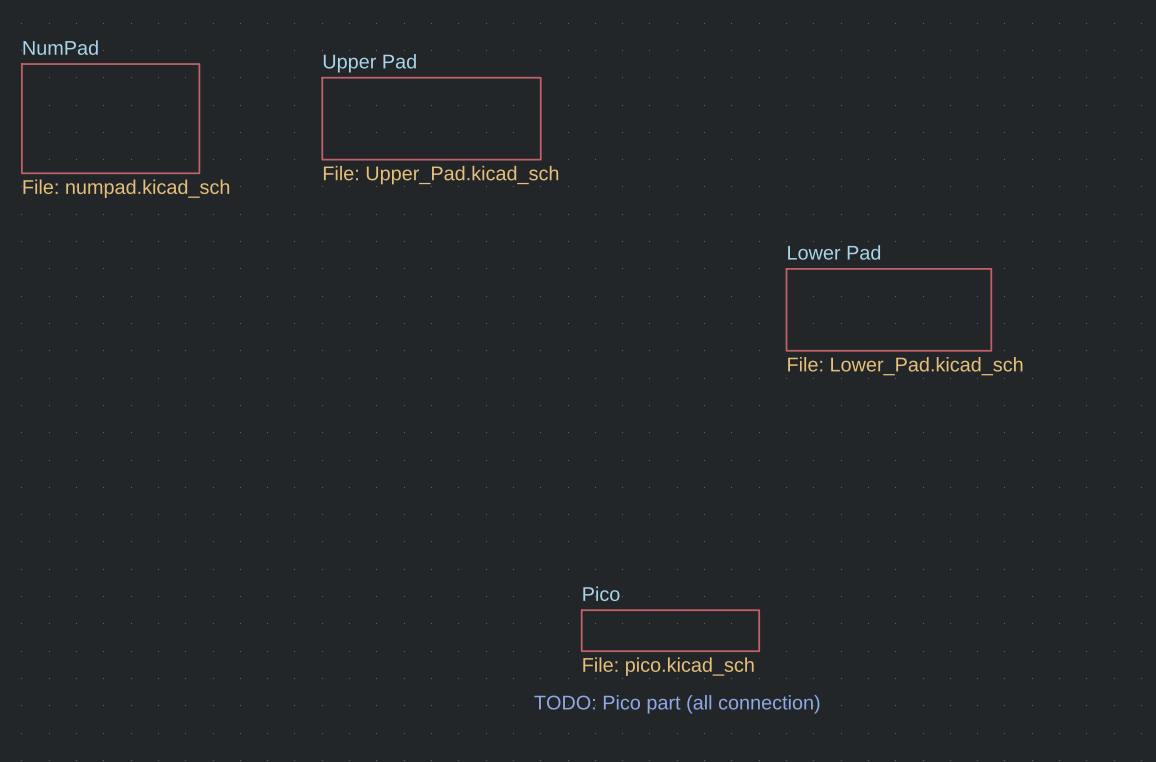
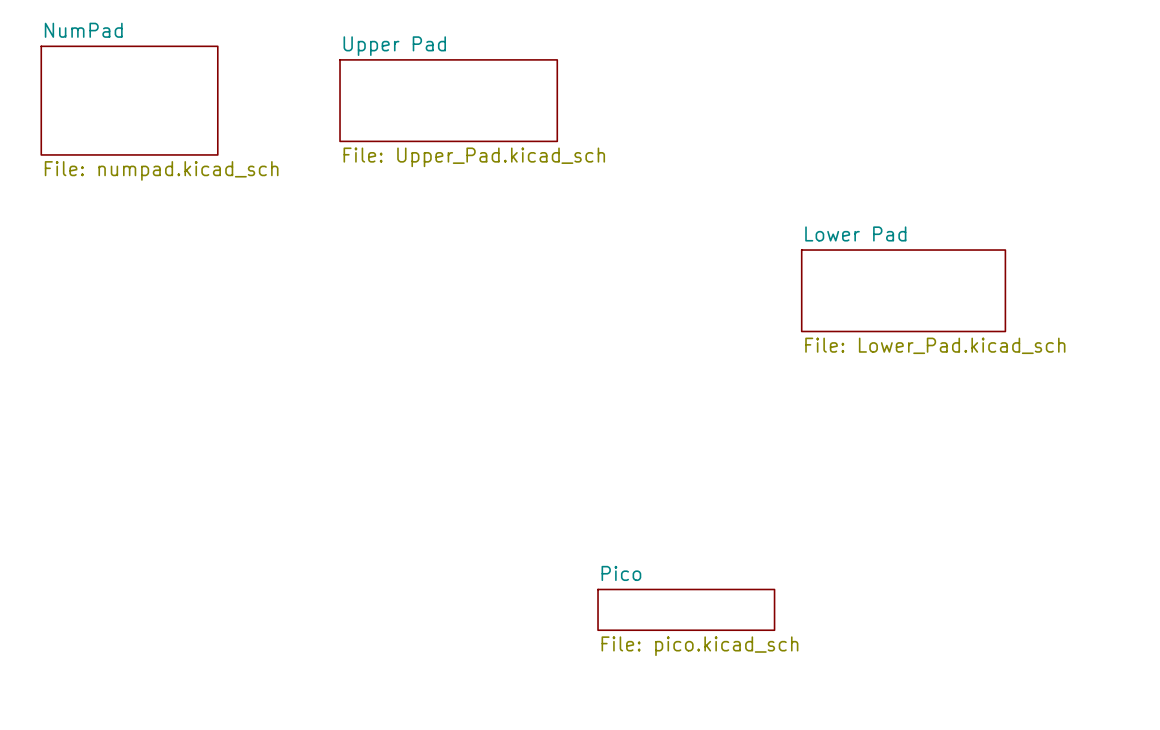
text: TODO: Pico part (all connection) (676, 704) -> none

